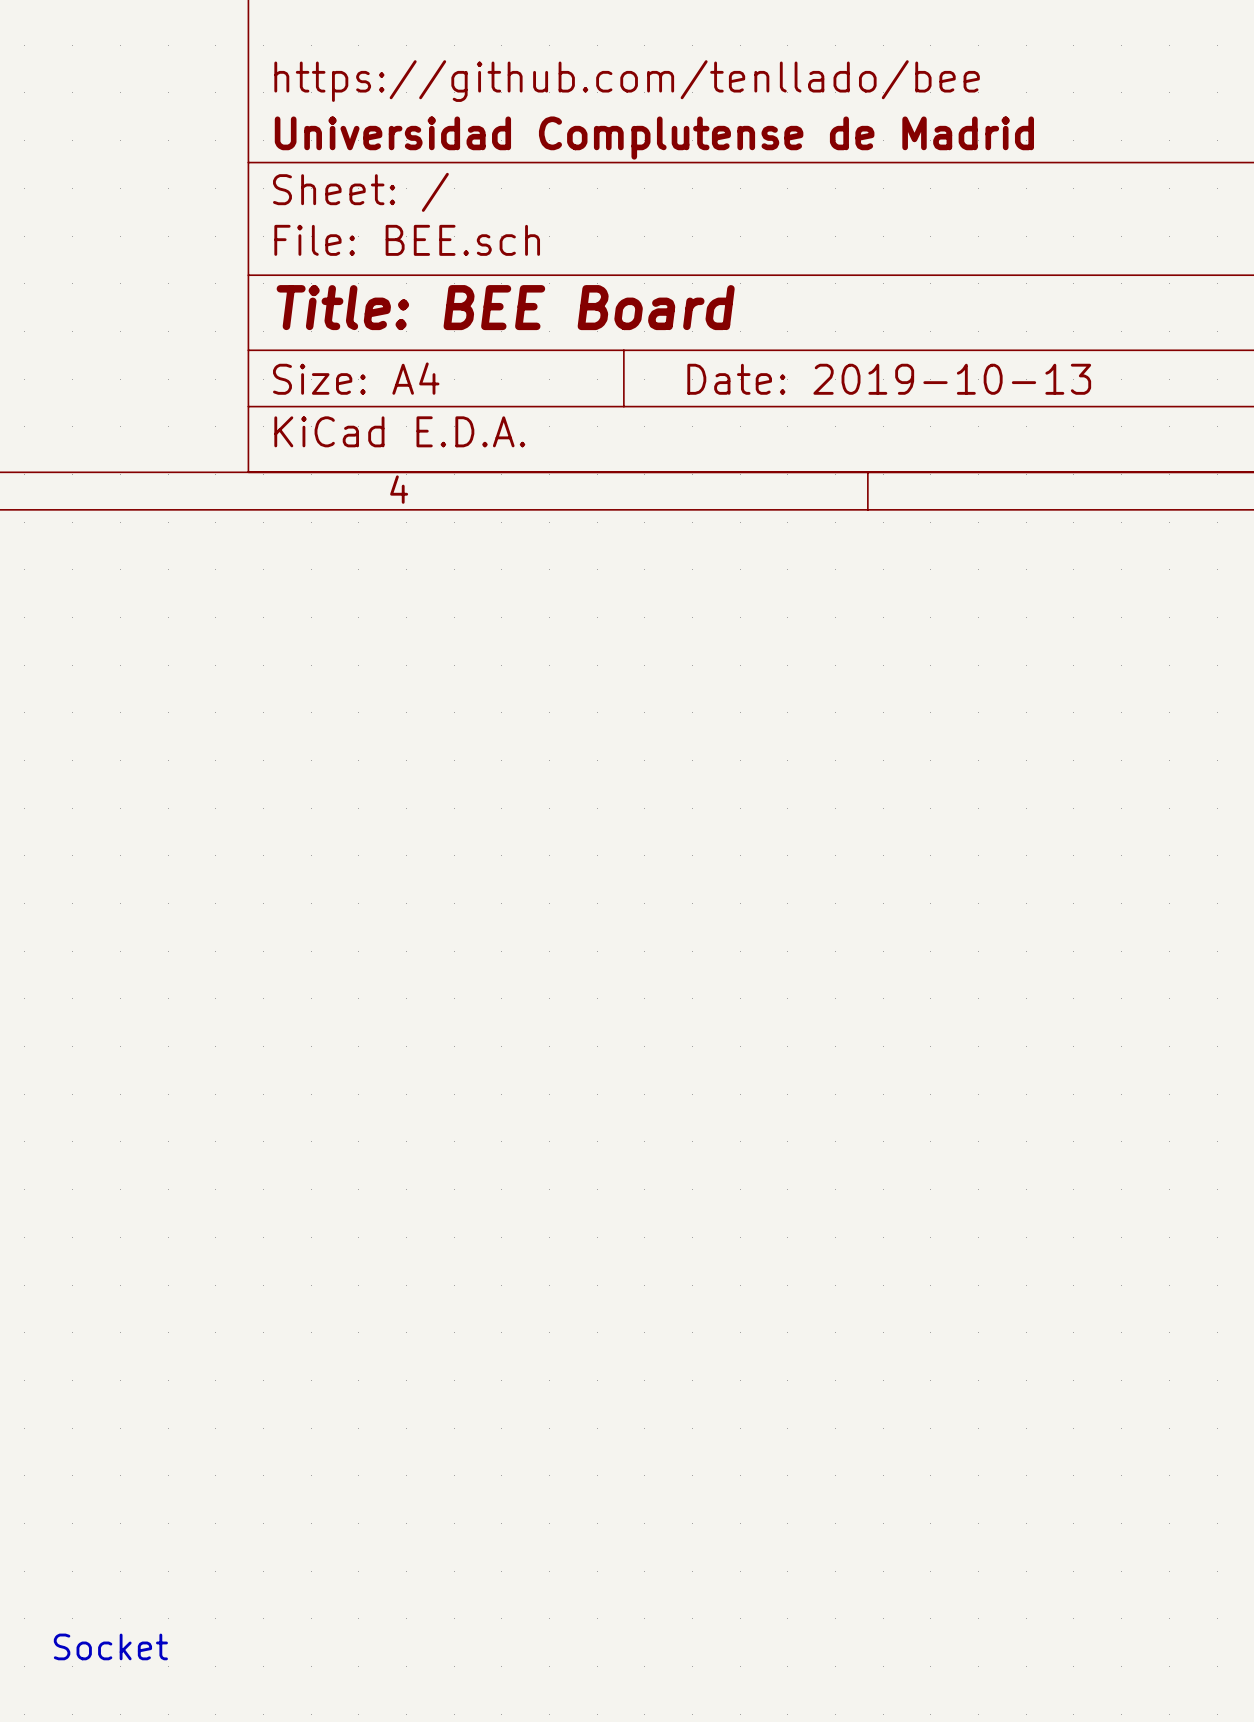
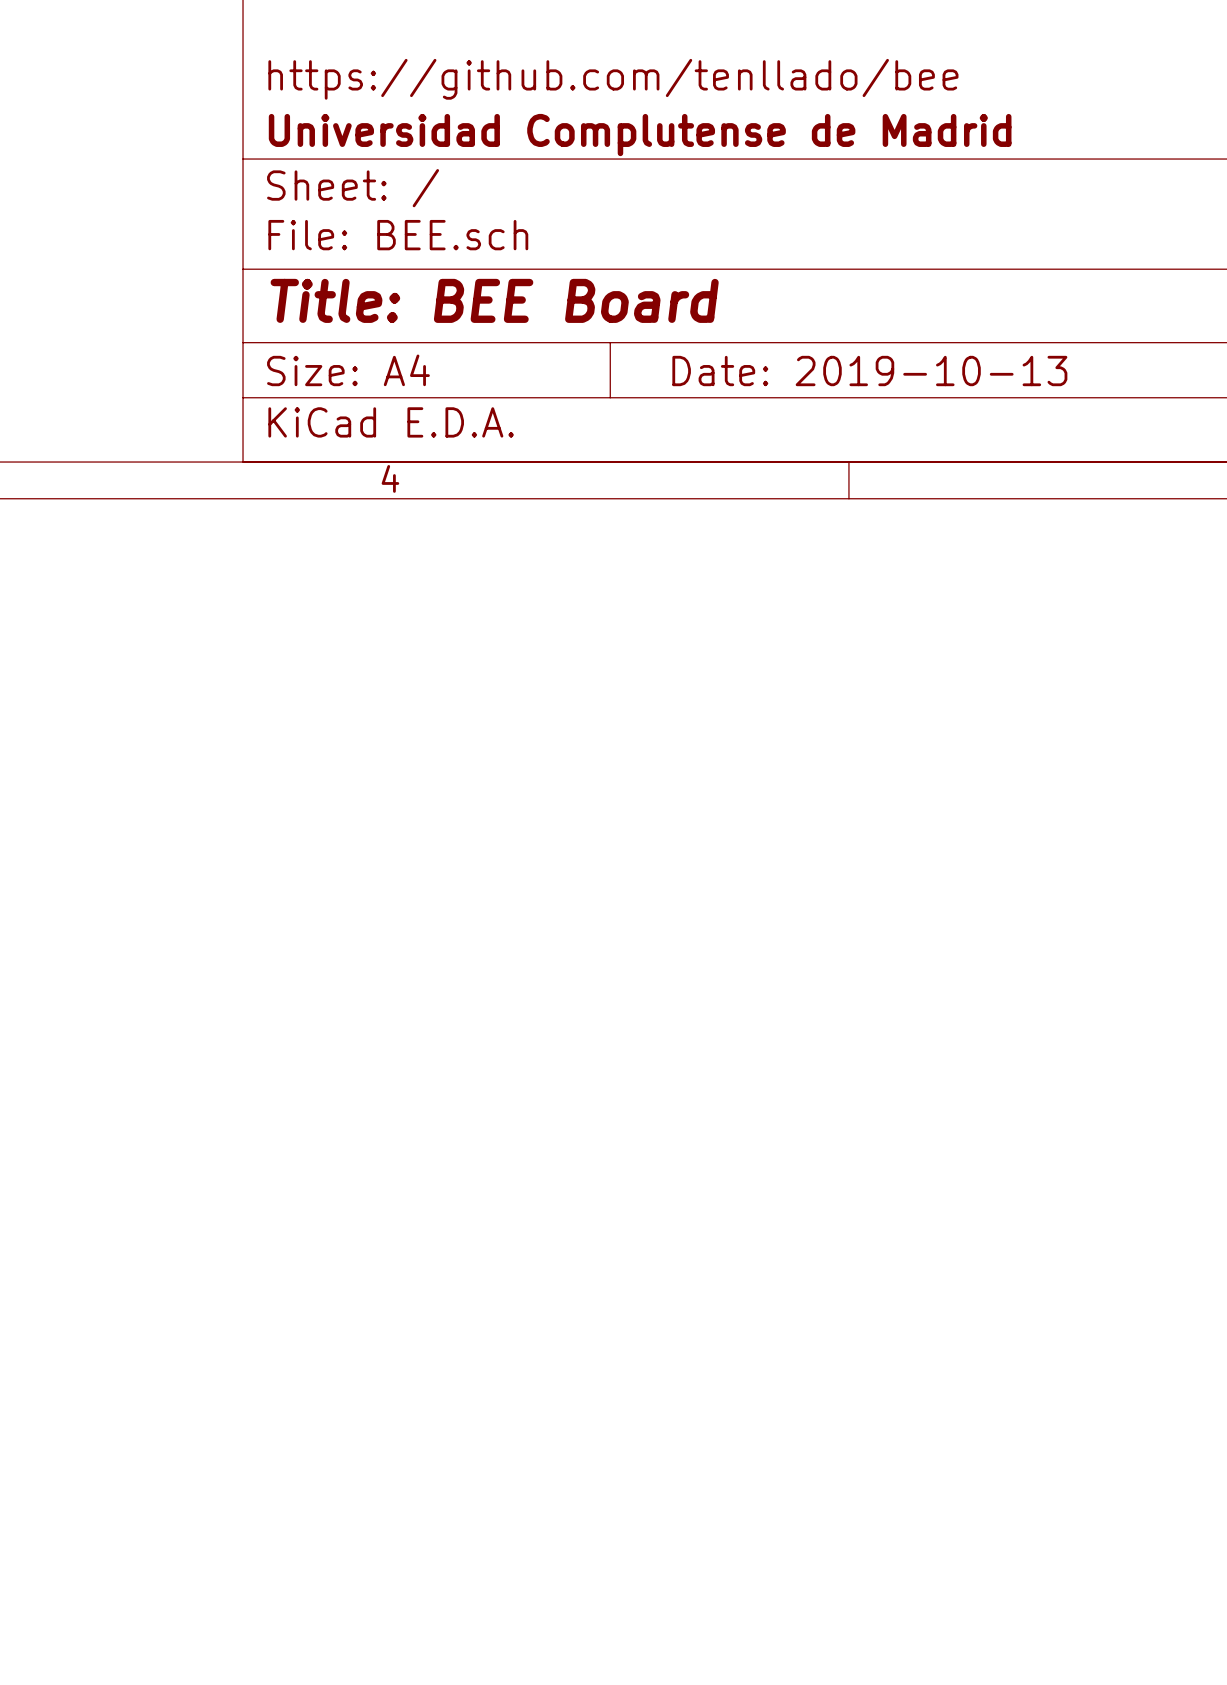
text: Socket (110, 1646) -> none

